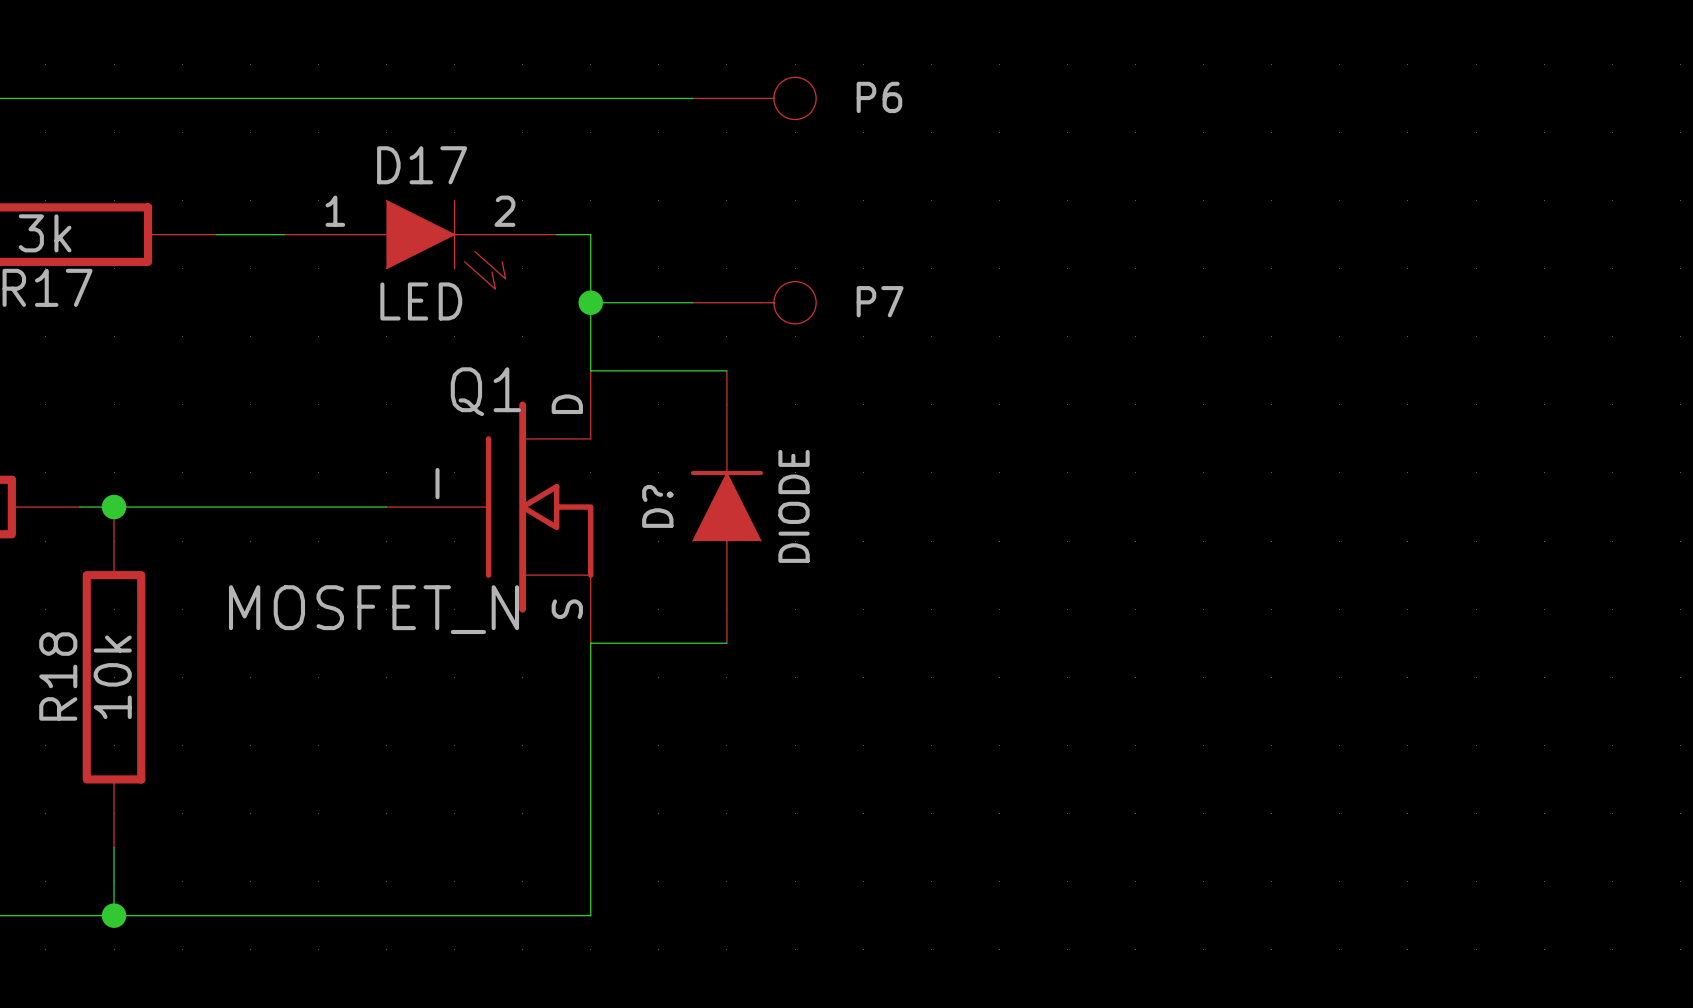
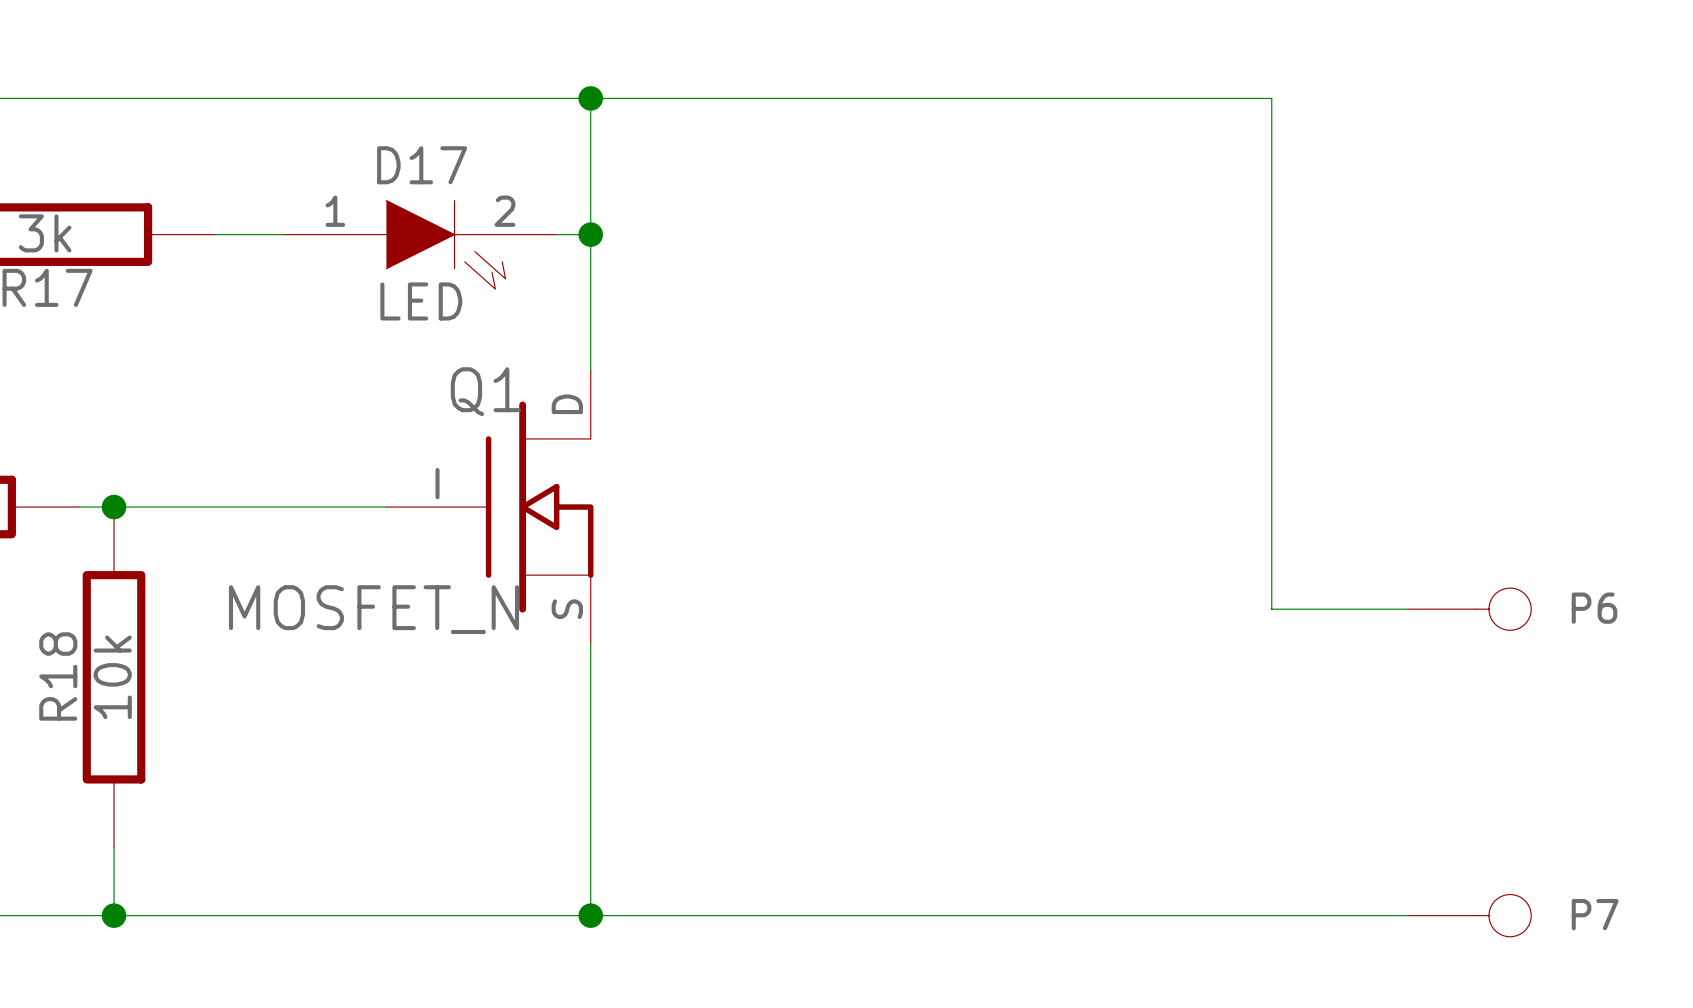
wire: none -> (590, 98) (590, 234)
junction: none -> (590, 98)
wire: none -> (692, 98) (1271, 98) (1271, 609) (1407, 609)
P6 position: (754, 98) -> (1469, 609)
wire: (590, 302) (692, 302) -> none
junction position: (590, 302) -> (590, 234)
P7 position: (754, 302) -> (1469, 915)
wire: (590, 370) (726, 370) -> none
D?: DIODE (726, 507) -> none
wire: (590, 643) (726, 643) -> none
wire: none -> (590, 915) (1407, 915)
junction: none -> (590, 915)

